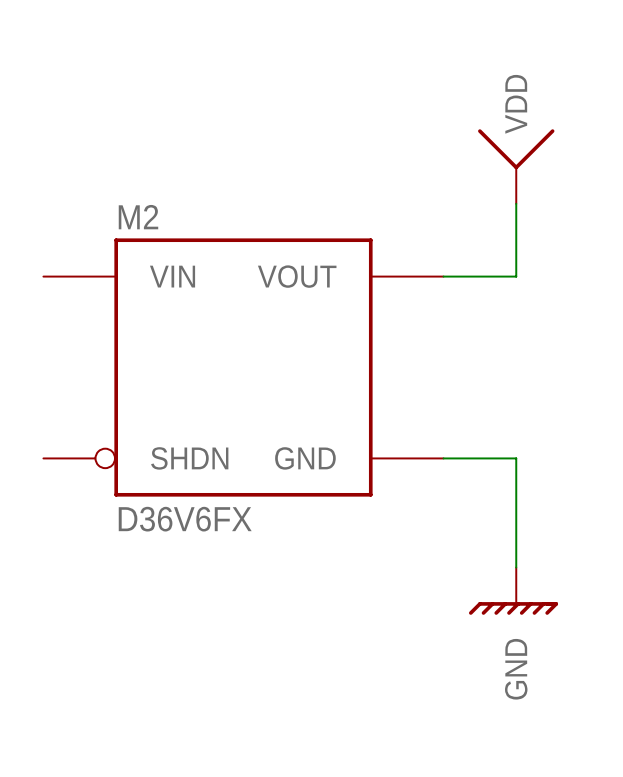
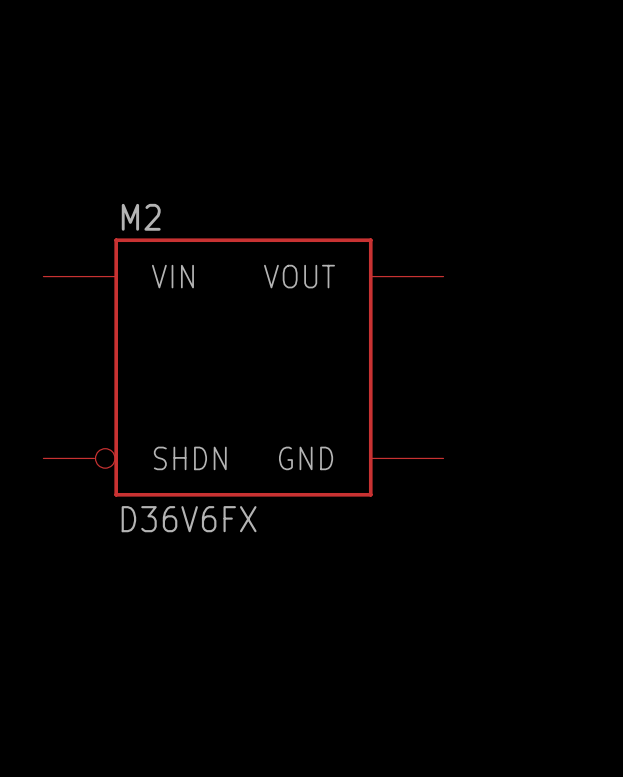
power symbol: (516, 166) -> none
wire: (516, 203) (516, 276) (443, 276) -> none
wire: (443, 458) (516, 458) (516, 567) -> none
power symbol: (513, 591) -> none

